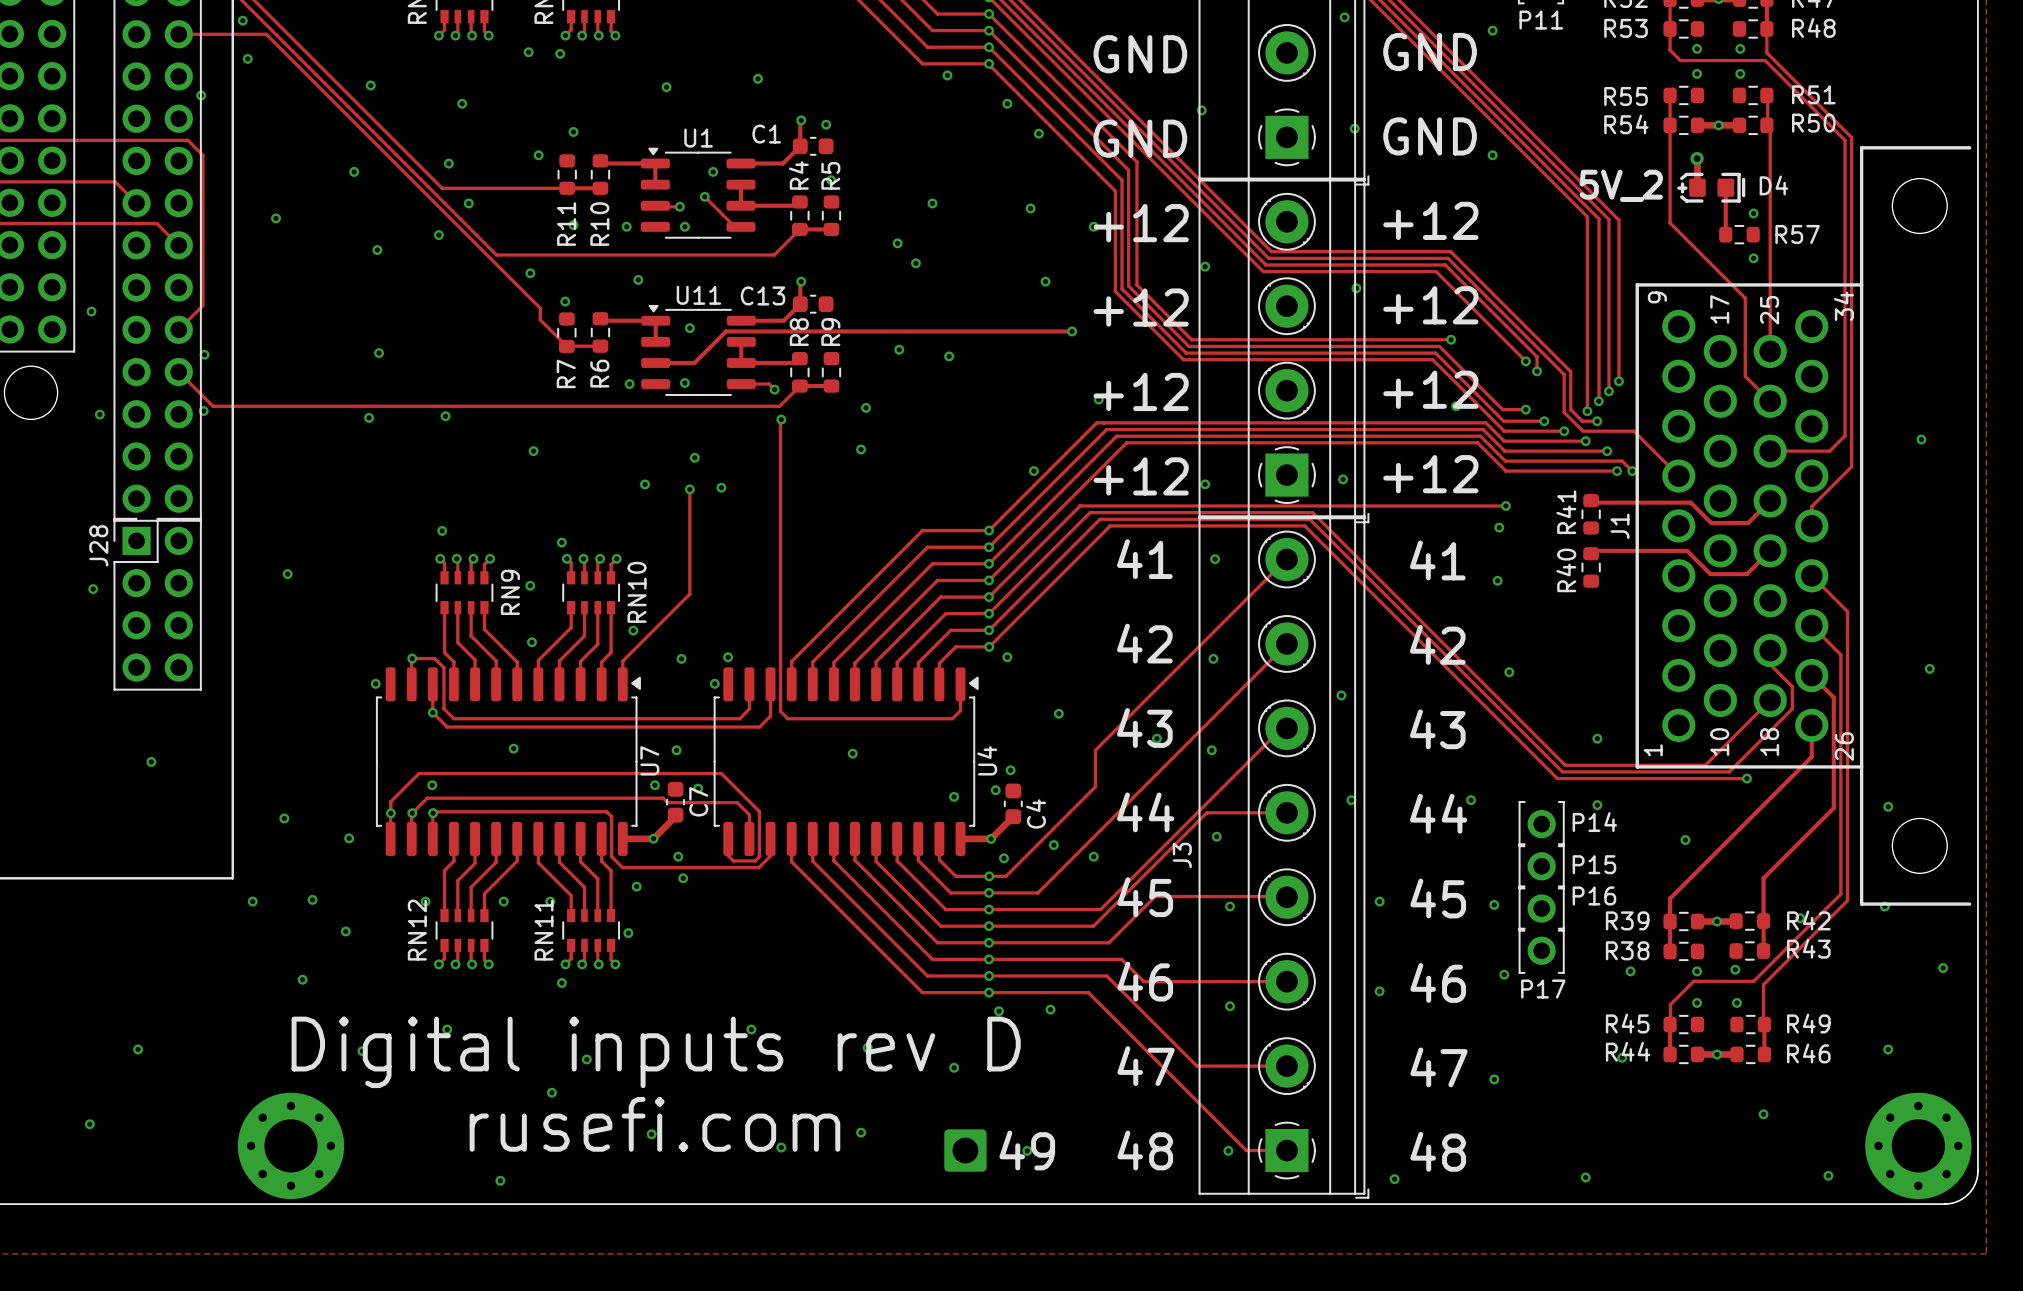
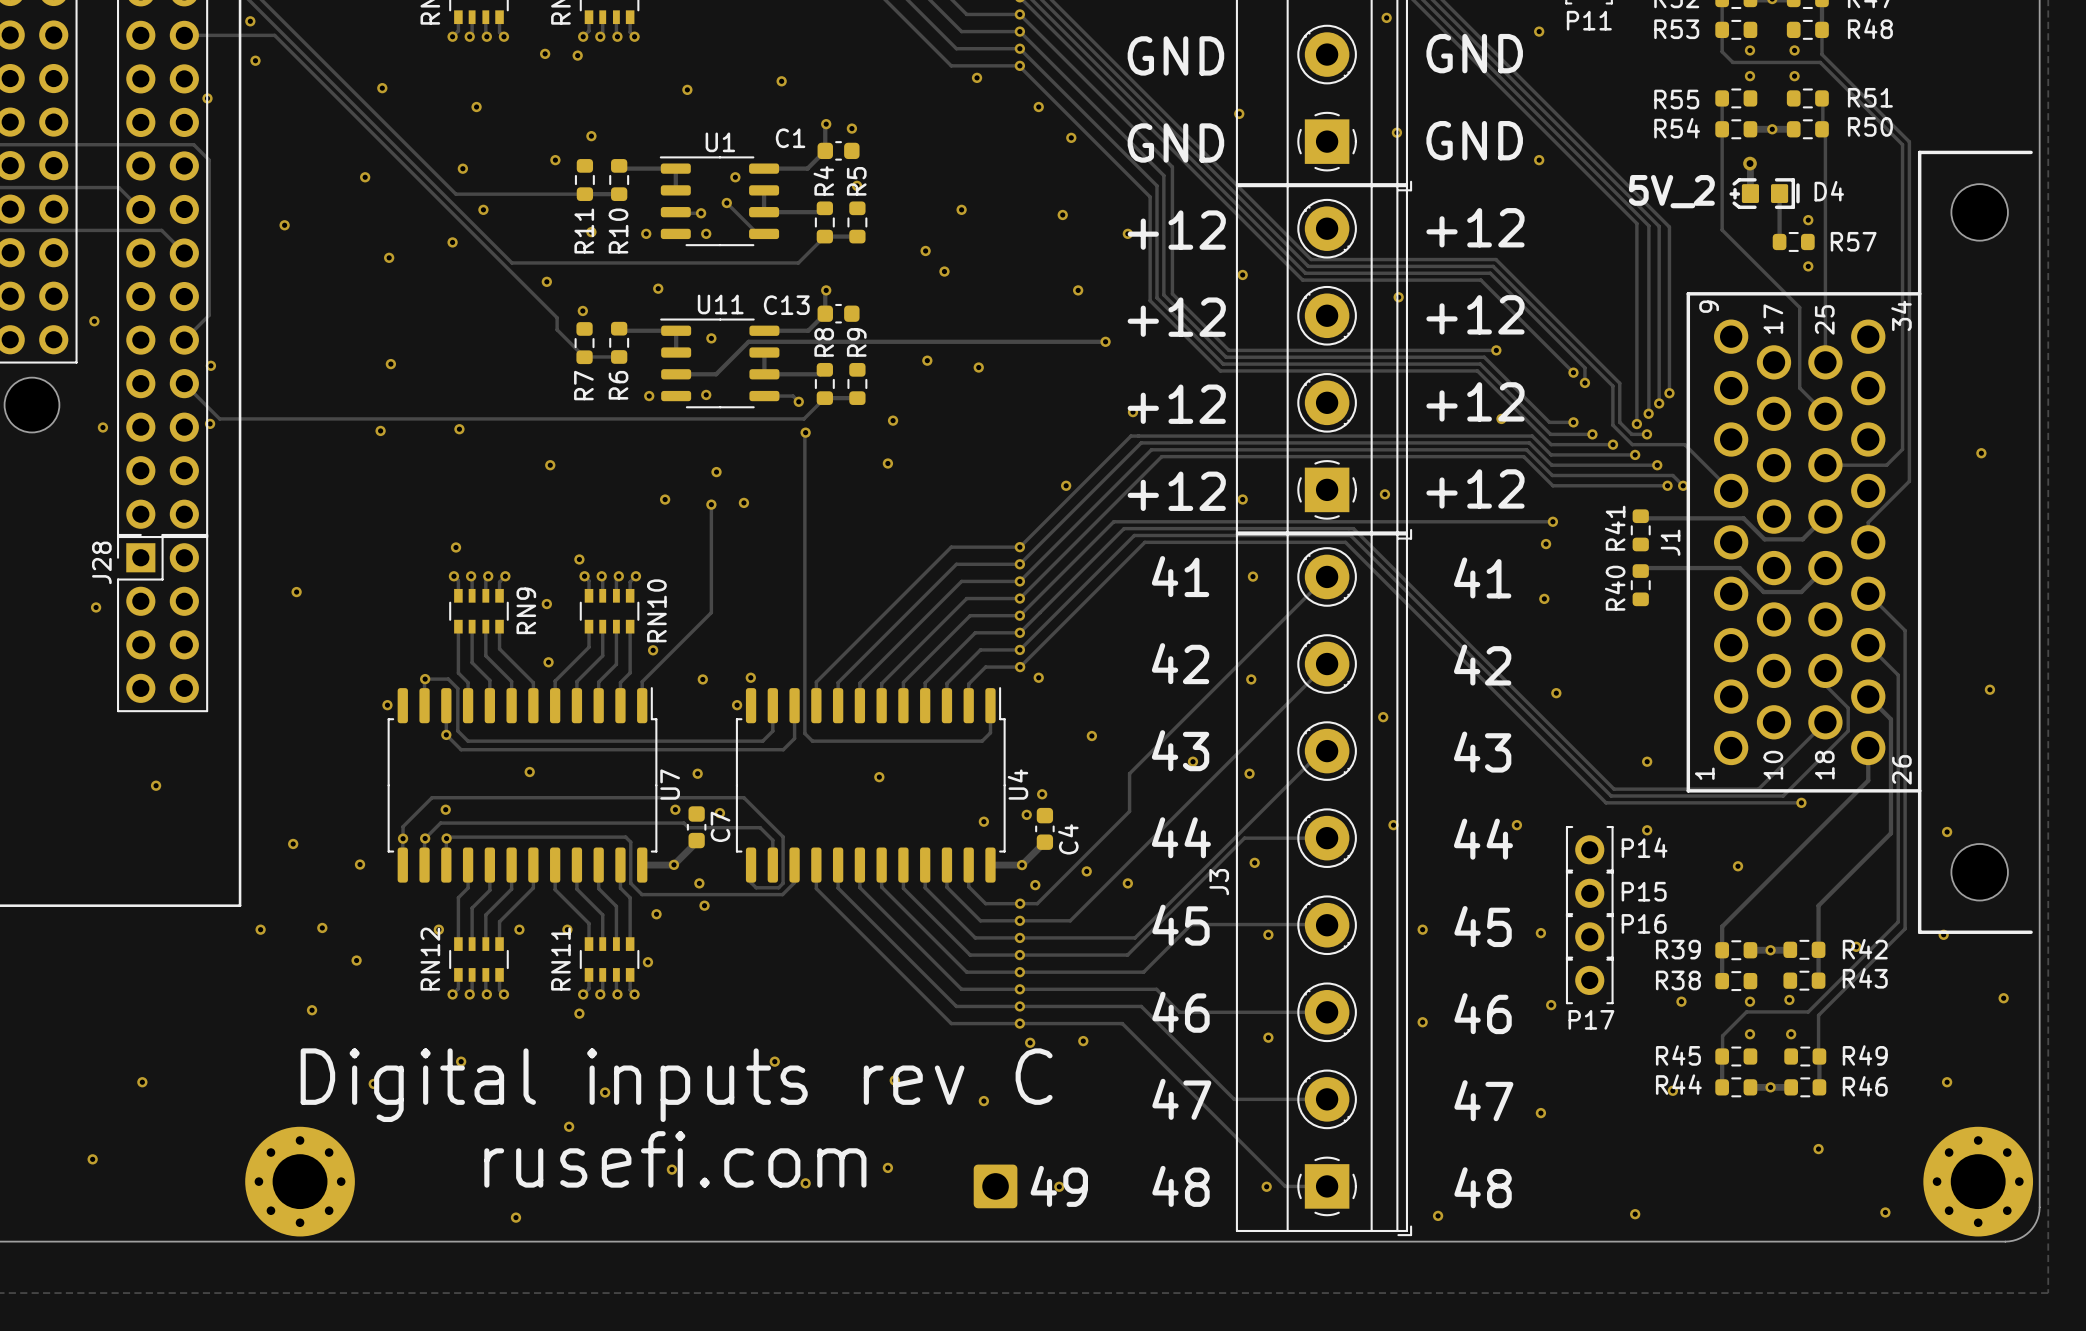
U1 footprint: [640, 147, 756, 239] -> [659, 156, 780, 247]
U11 footprint: [641, 304, 756, 396] -> [660, 318, 780, 409]
U7 footprint: [375, 667, 641, 856] -> [387, 687, 658, 883]
U4 footprint: [713, 667, 979, 856] -> [735, 687, 1006, 883]
text: Digital inputs rev D (656, 1052) -> Digital inputs rev С (676, 1085)

